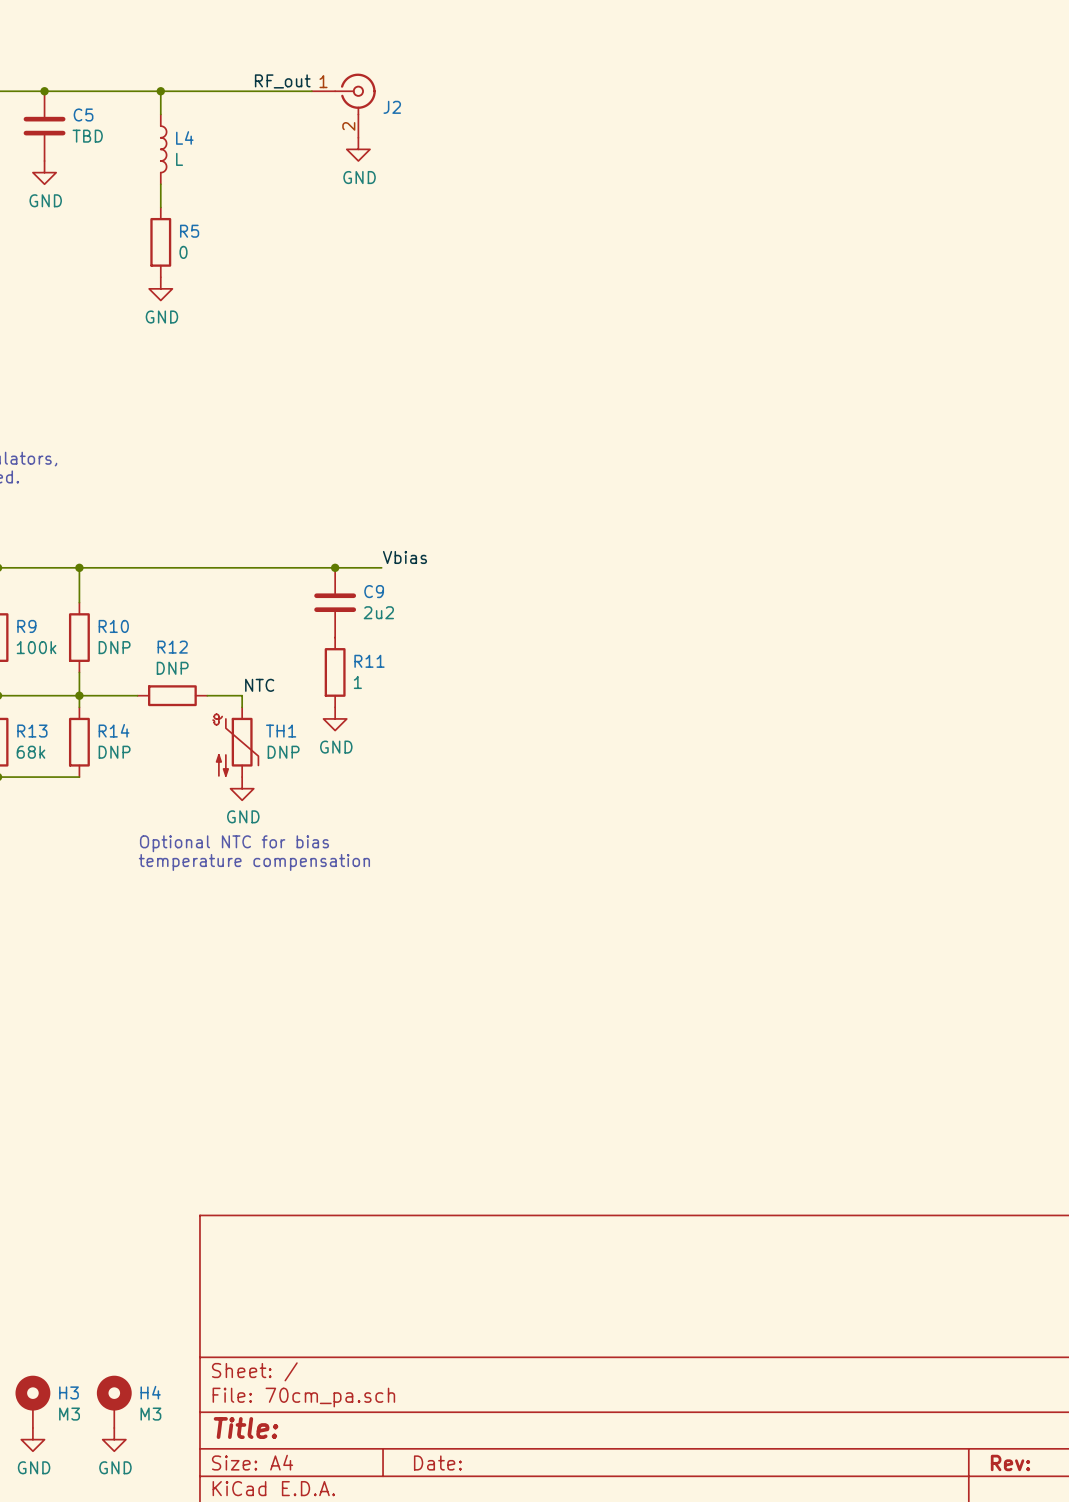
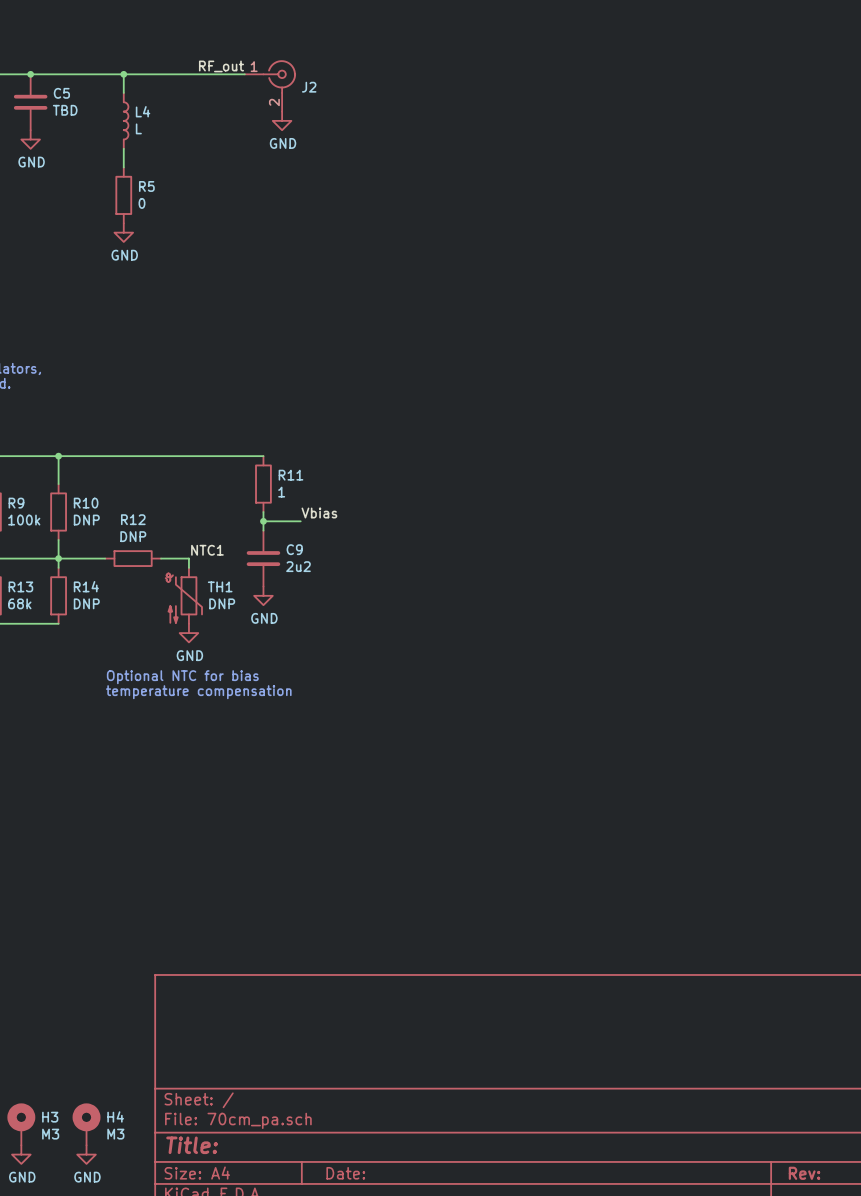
label position: Vbias (404, 557) -> Vbias (319, 513)
wire: (335, 567) (381, 567) -> (263, 521) (300, 521)
junction: (335, 567) -> none
C9 position: (335, 602) -> (263, 558)
junction: none -> (263, 521)
R11 position: (335, 672) -> (263, 484)
label: NTC (259, 685) -> NTC1 (207, 550)
power symbol position: GND (335, 718) -> GND (263, 595)

